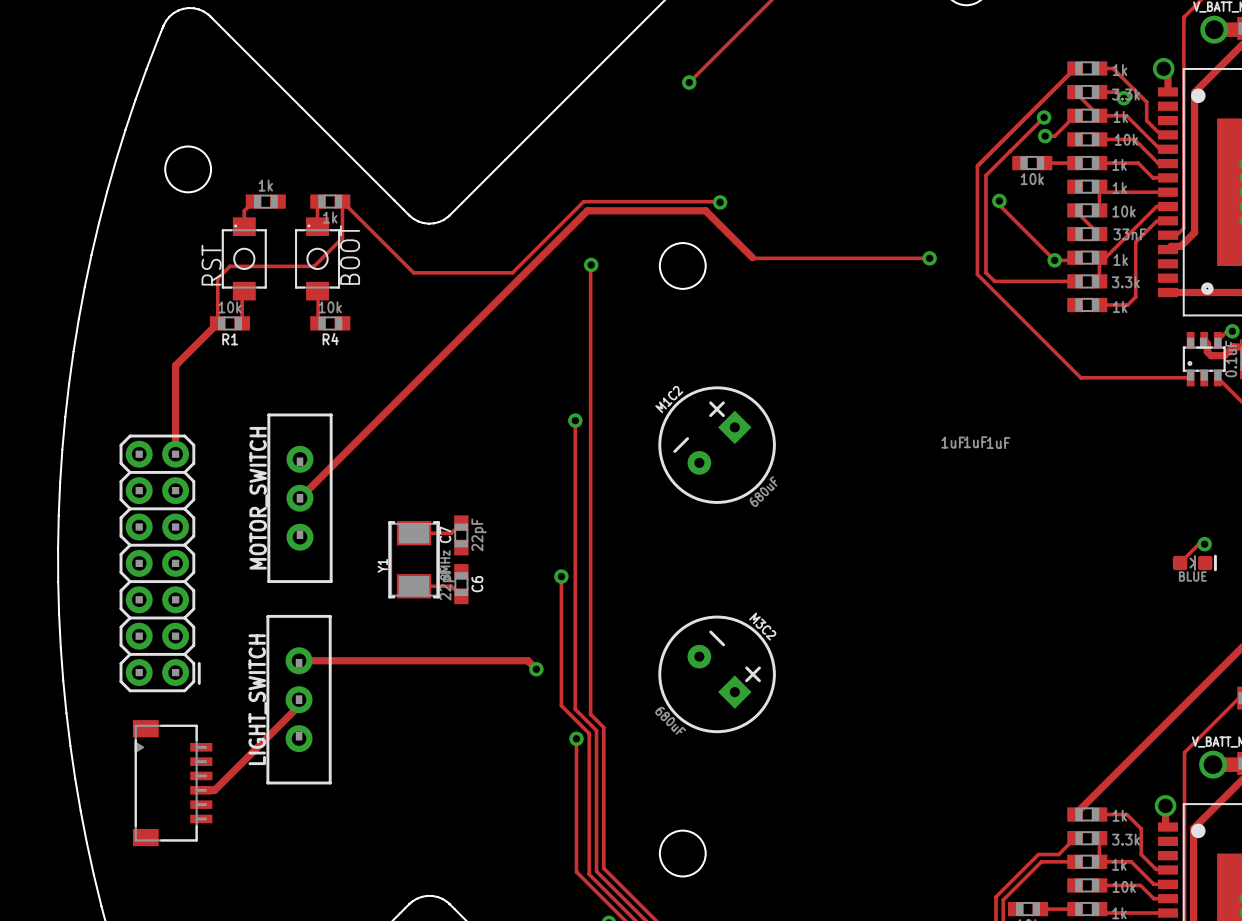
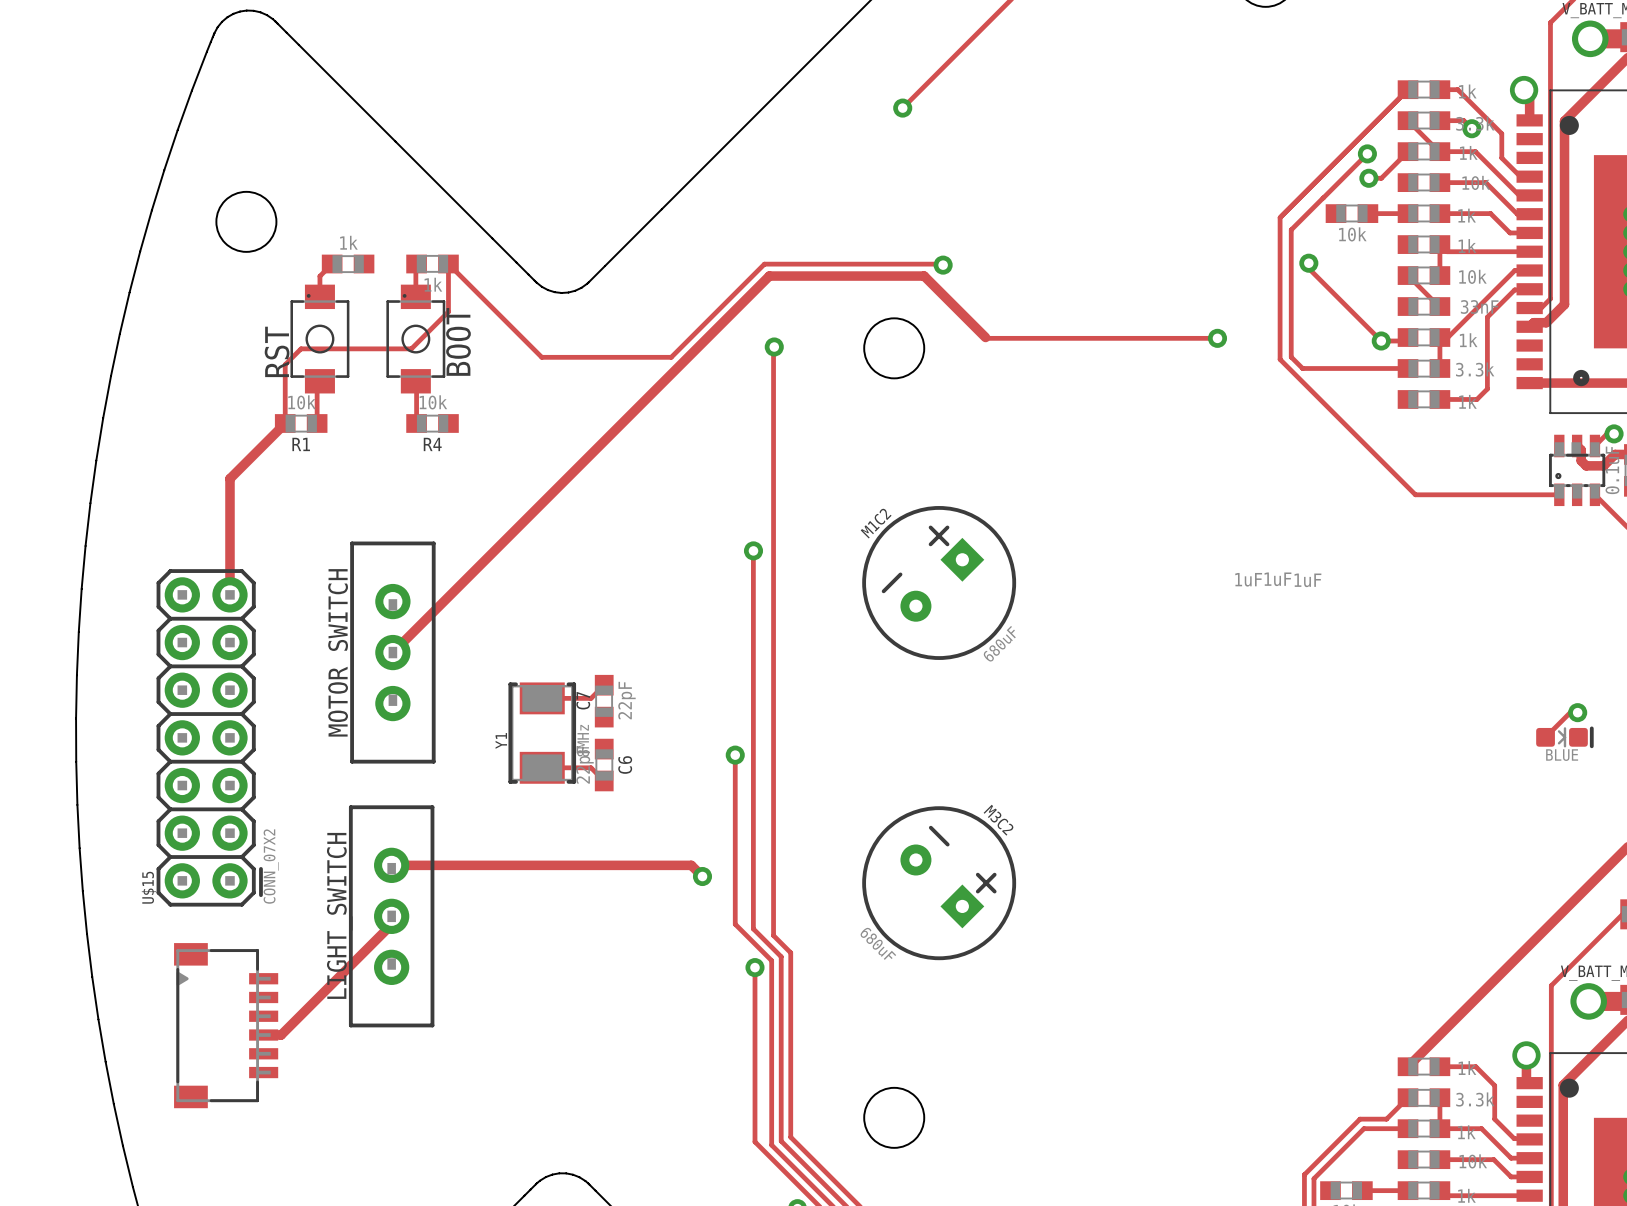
U$15 value: none -> CONN_07X2 (271, 866)
U$15 name: none -> U$15 (148, 887)

